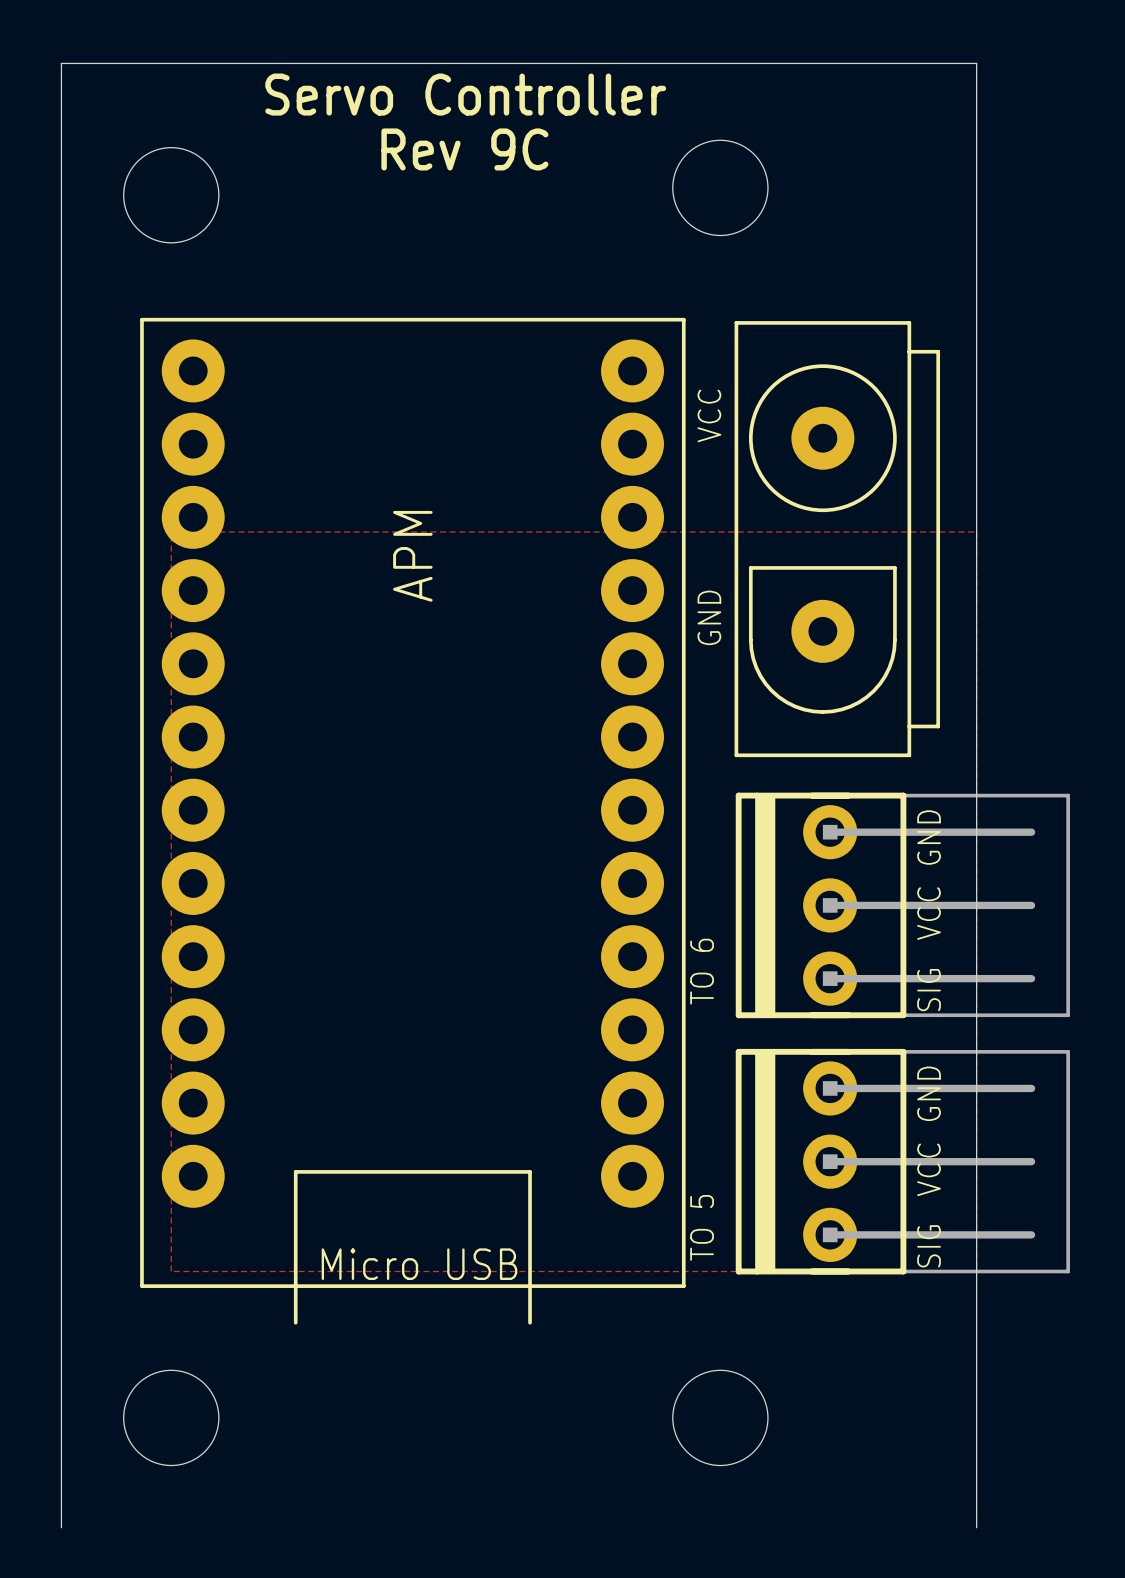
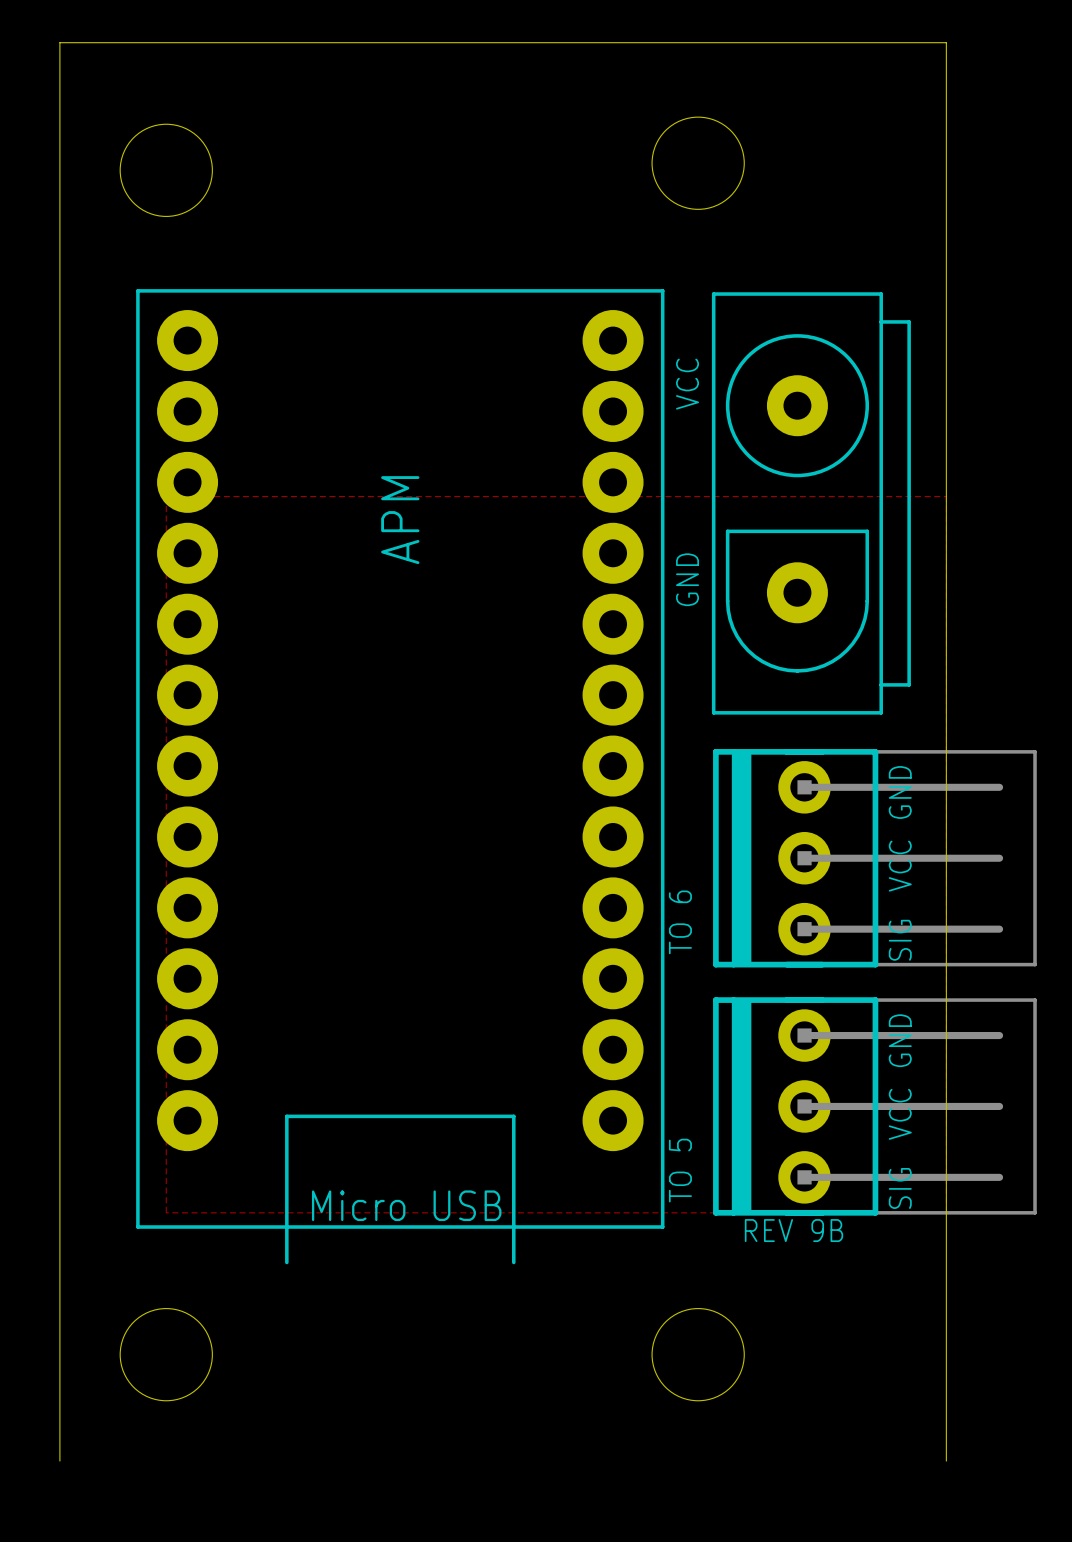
text: Servo Controller (465, 94) -> none
text: Rev 9C (464, 149) -> none
text: none -> REV 9B (793, 1230)

